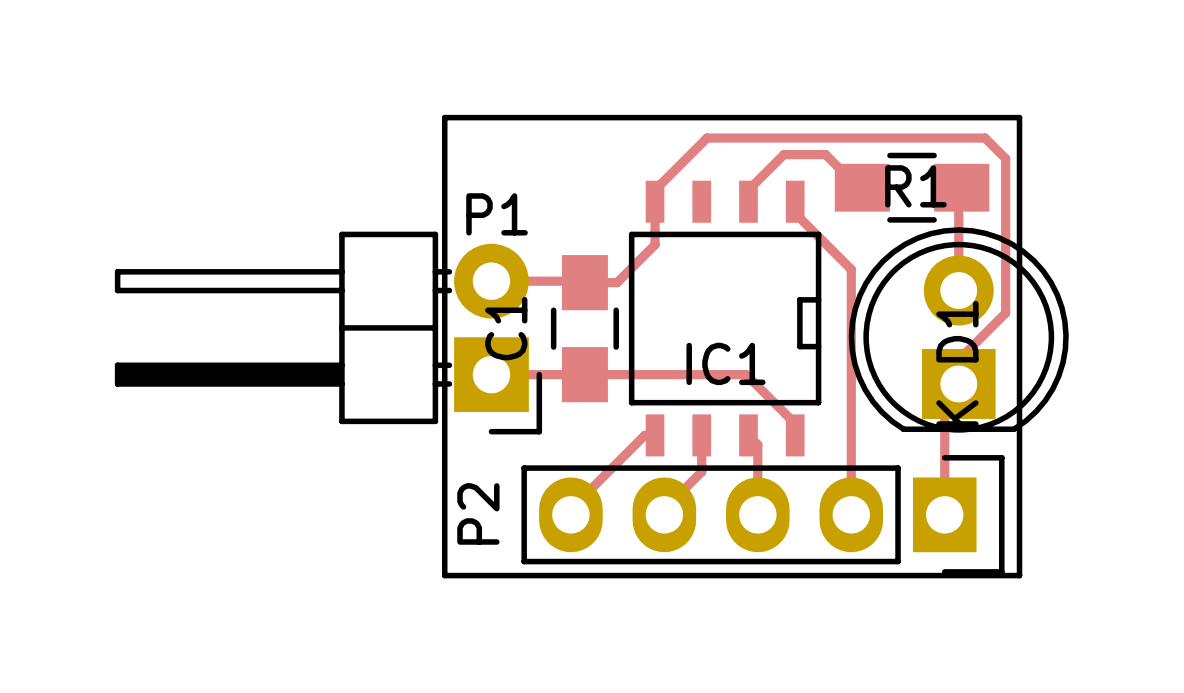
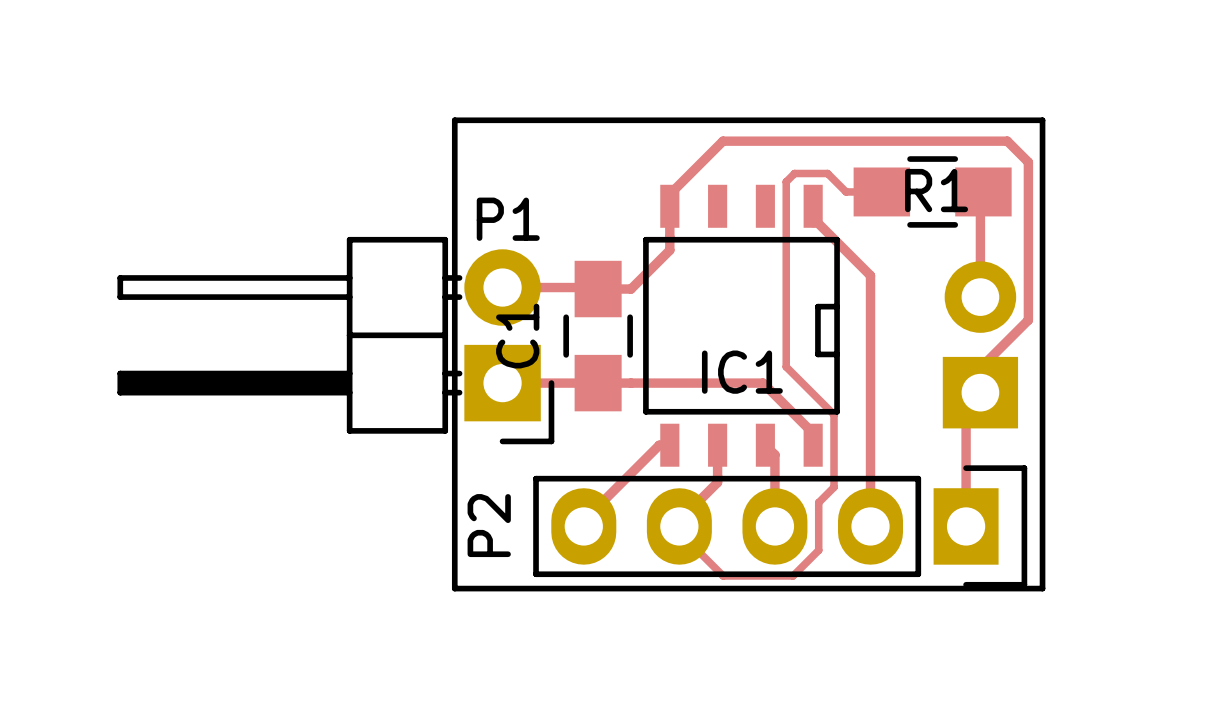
top track: (858, 187) (825, 154) (783, 154) (748, 190) -> none
top track: none -> (881, 191) (846, 191) (827, 173) (794, 173) (786, 181) (786, 366) (834, 414) (834, 487) (818, 502) (818, 550) (793, 575) (723, 575) (679, 532) (679, 526)
D1 side: top (958, 329) -> bottom (980, 344)

